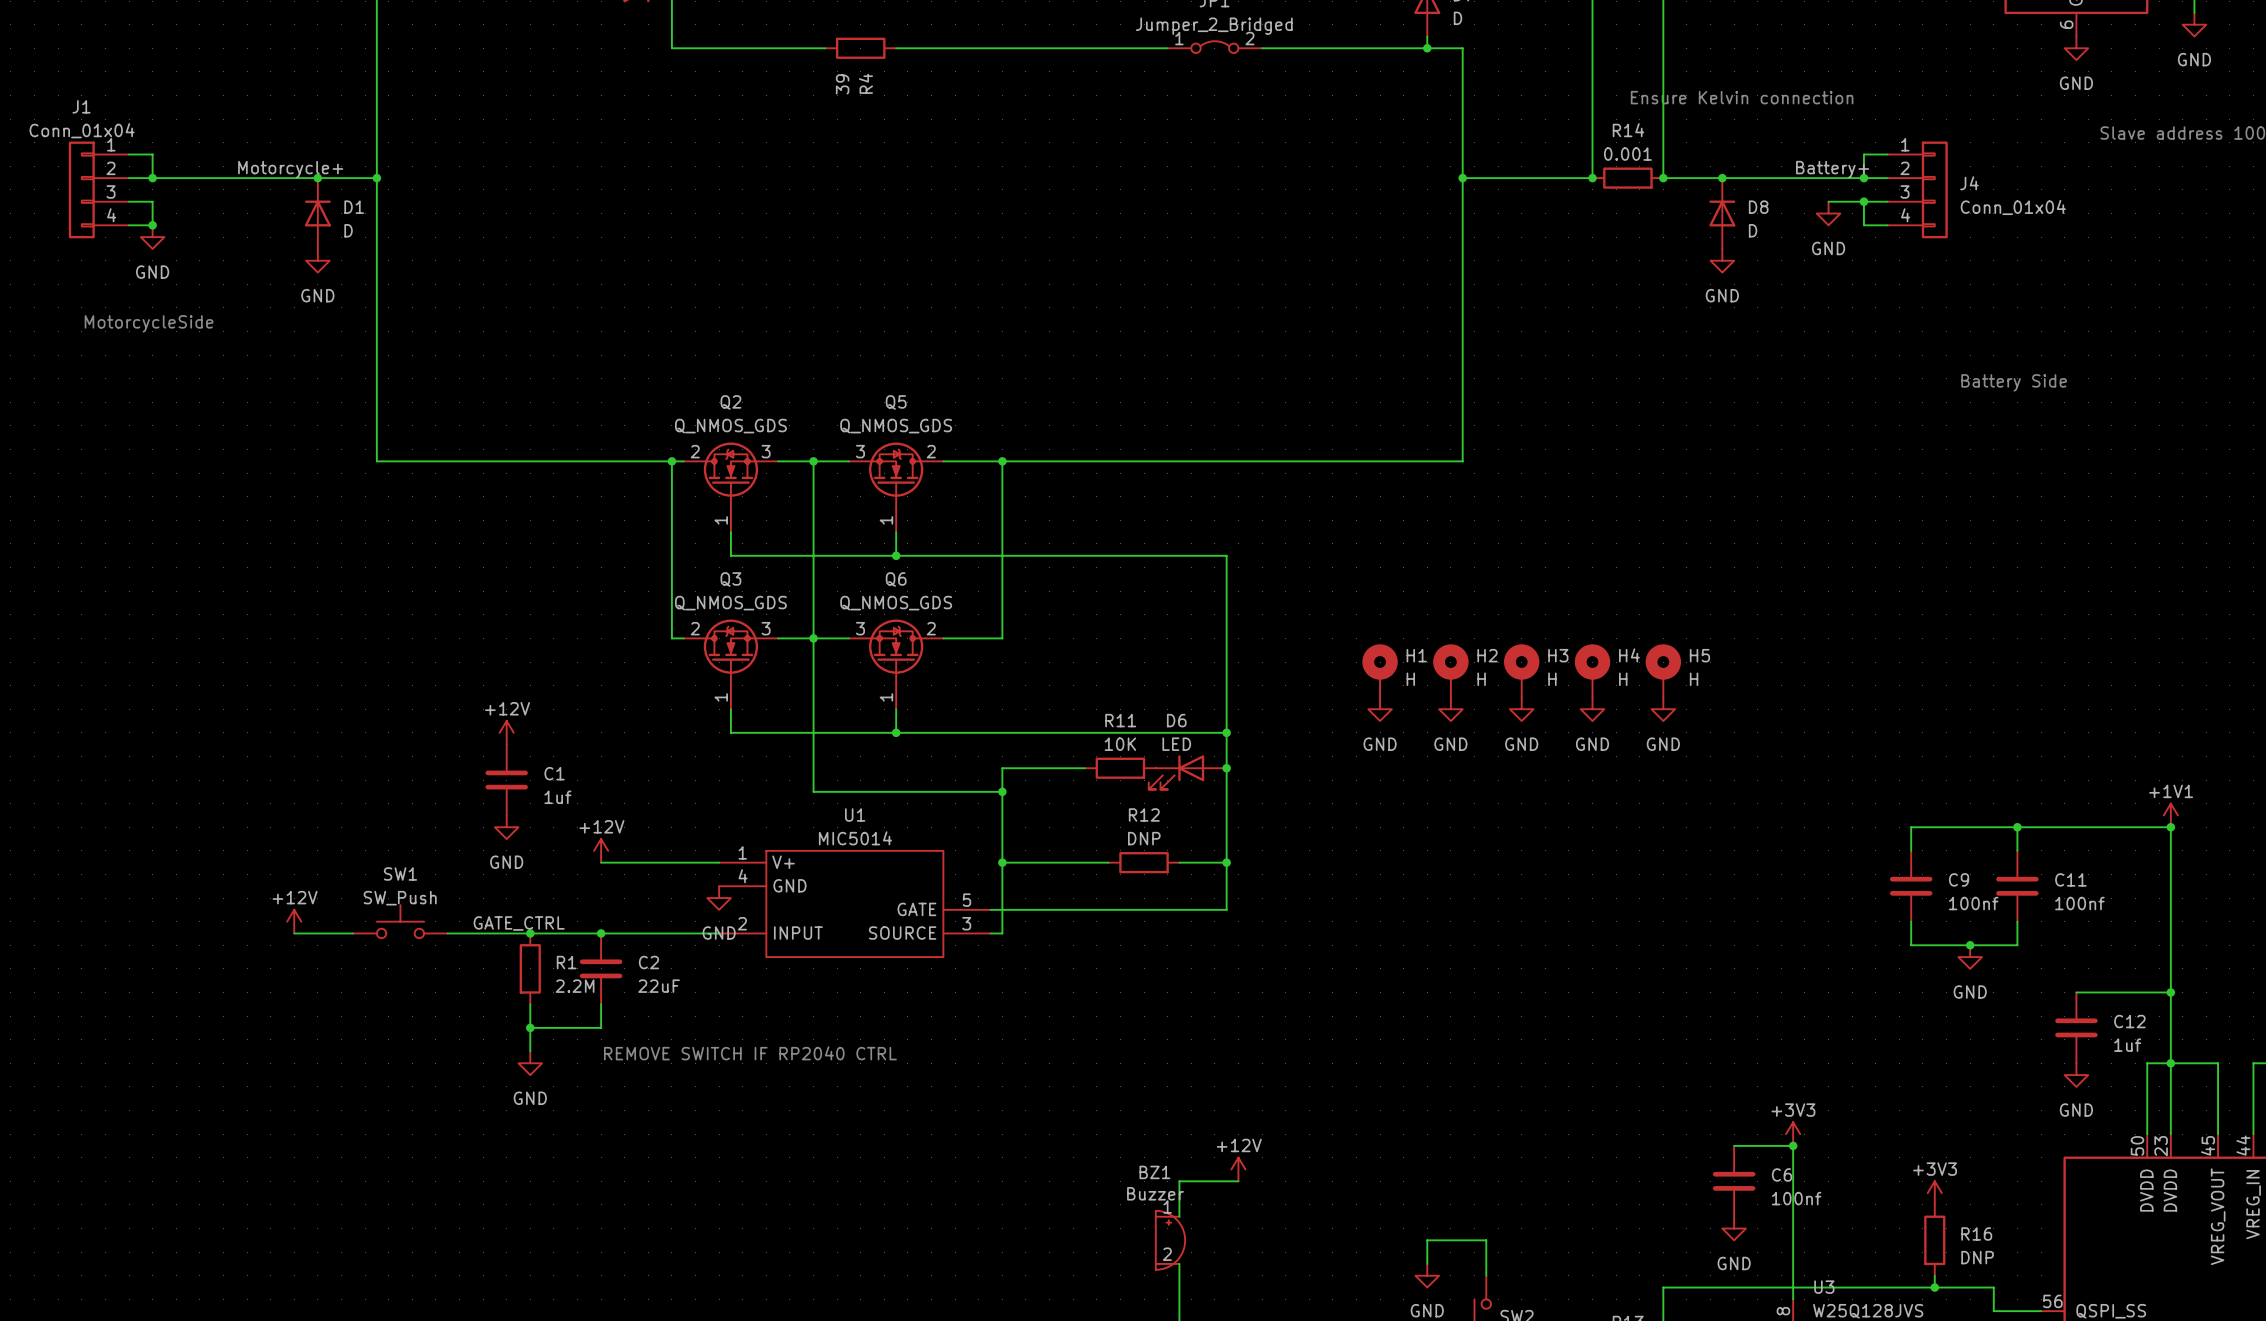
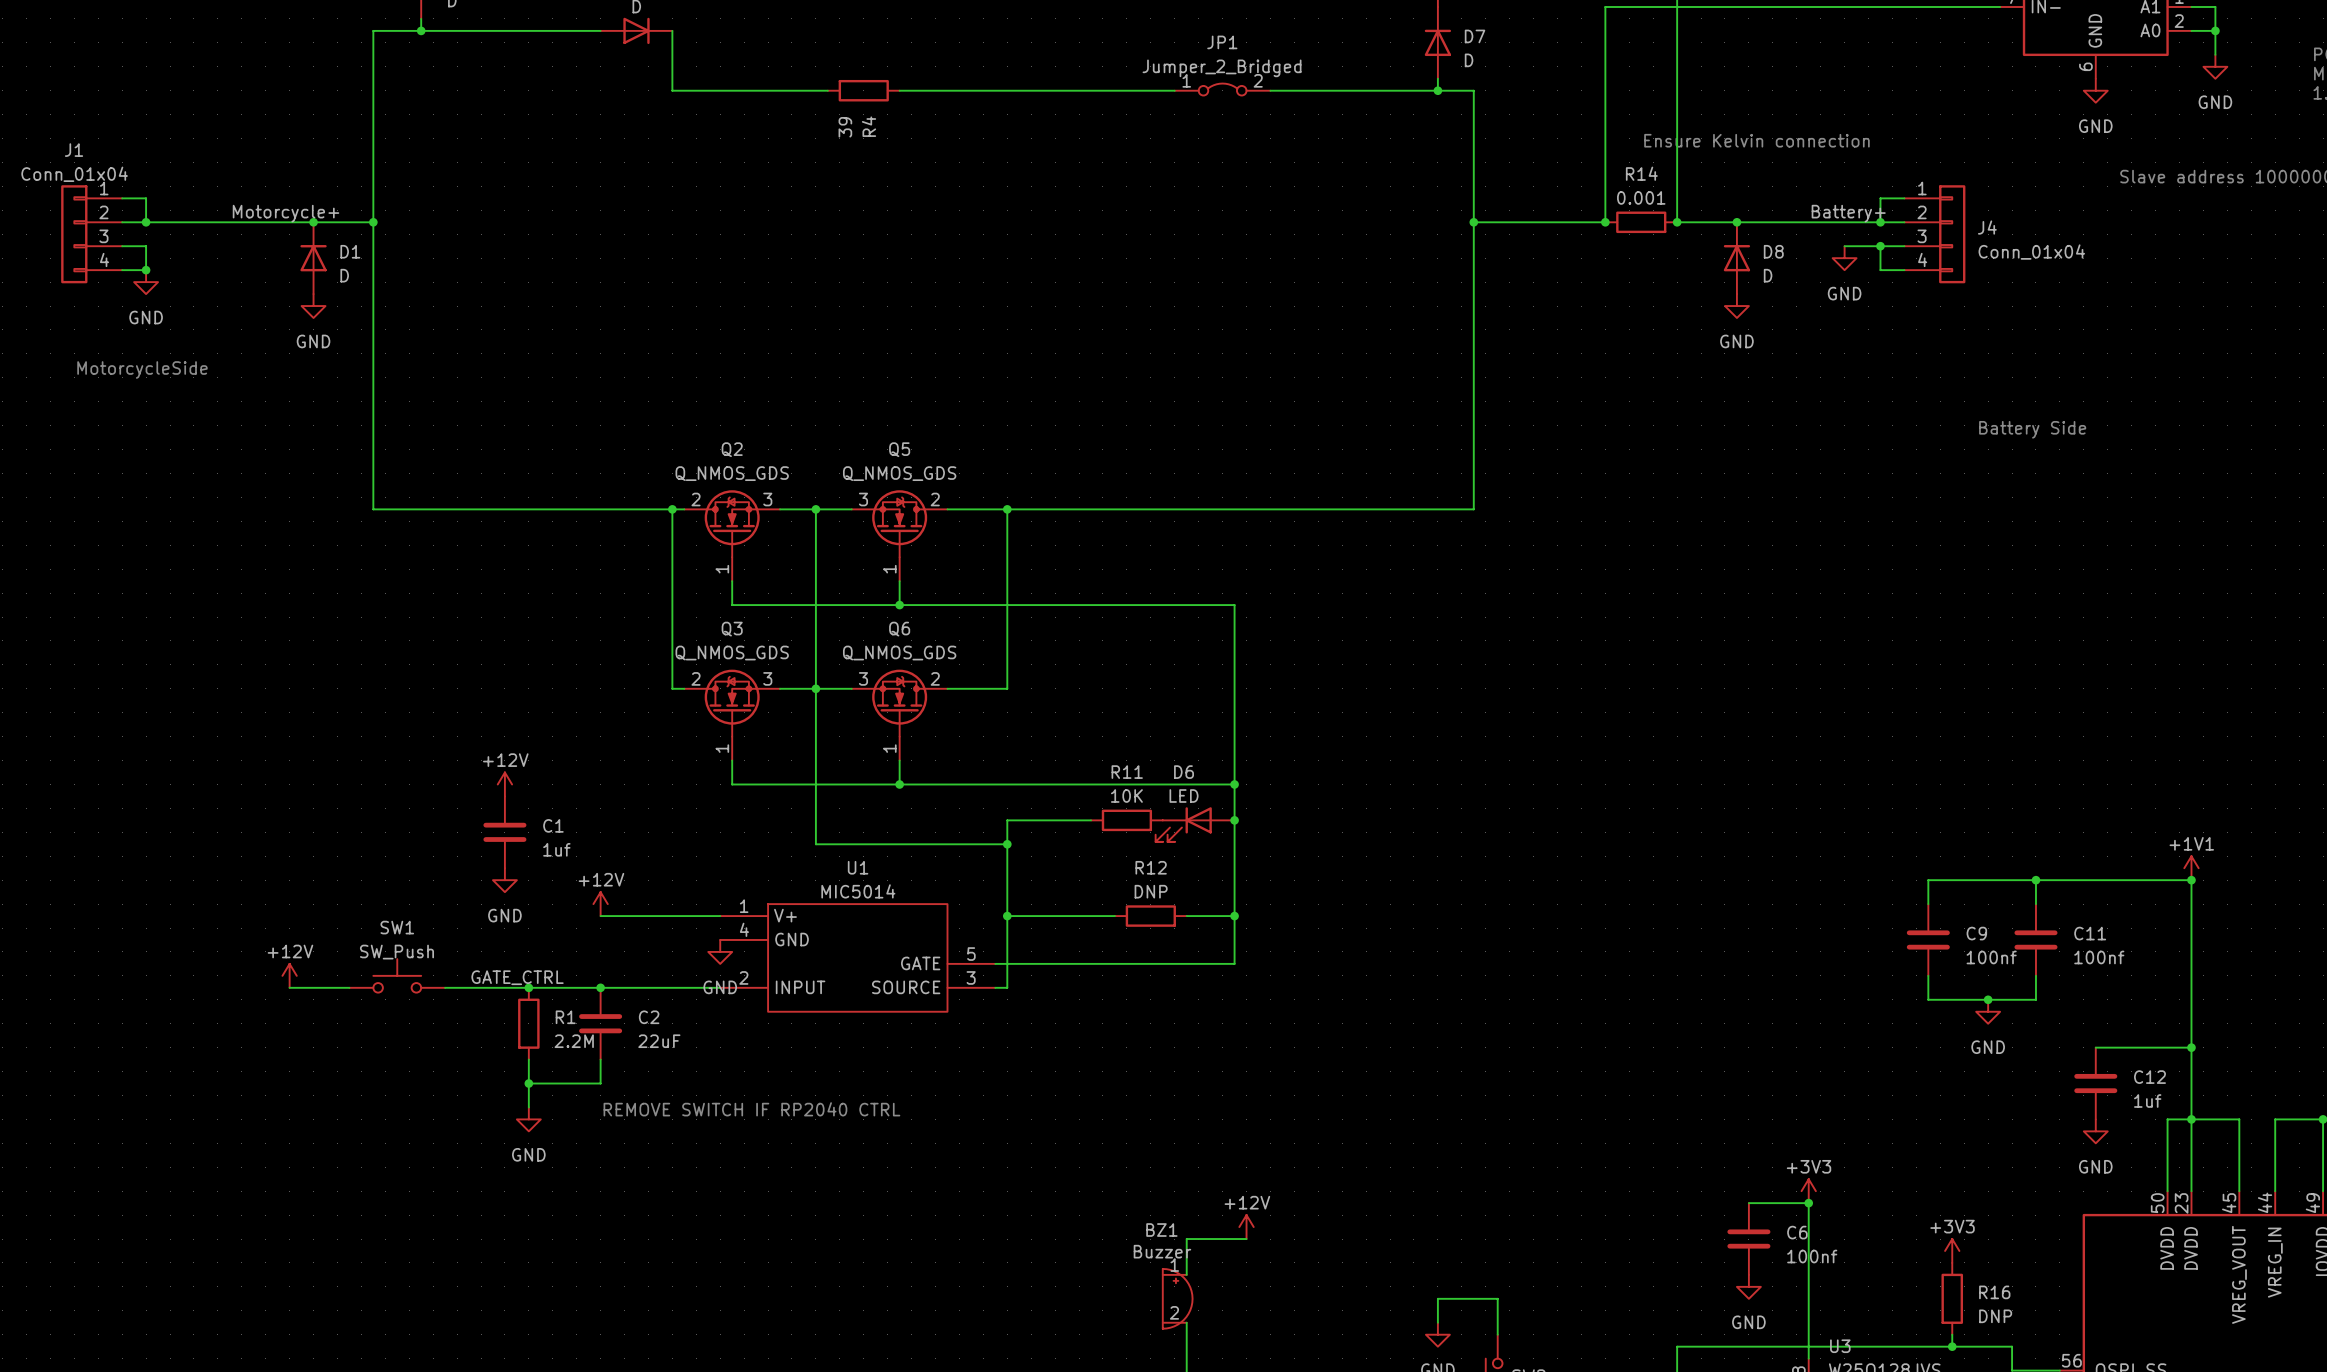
H1: H (1380, 670) -> none
H2: H (1450, 670) -> none
H3: H (1521, 670) -> none
H4: H (1592, 670) -> none
H5: H (1663, 670) -> none
power symbol: GND (1380, 709) -> none
power symbol: GND (1450, 709) -> none
power symbol: GND (1521, 709) -> none
power symbol: GND (1592, 709) -> none
power symbol: GND (1663, 709) -> none

